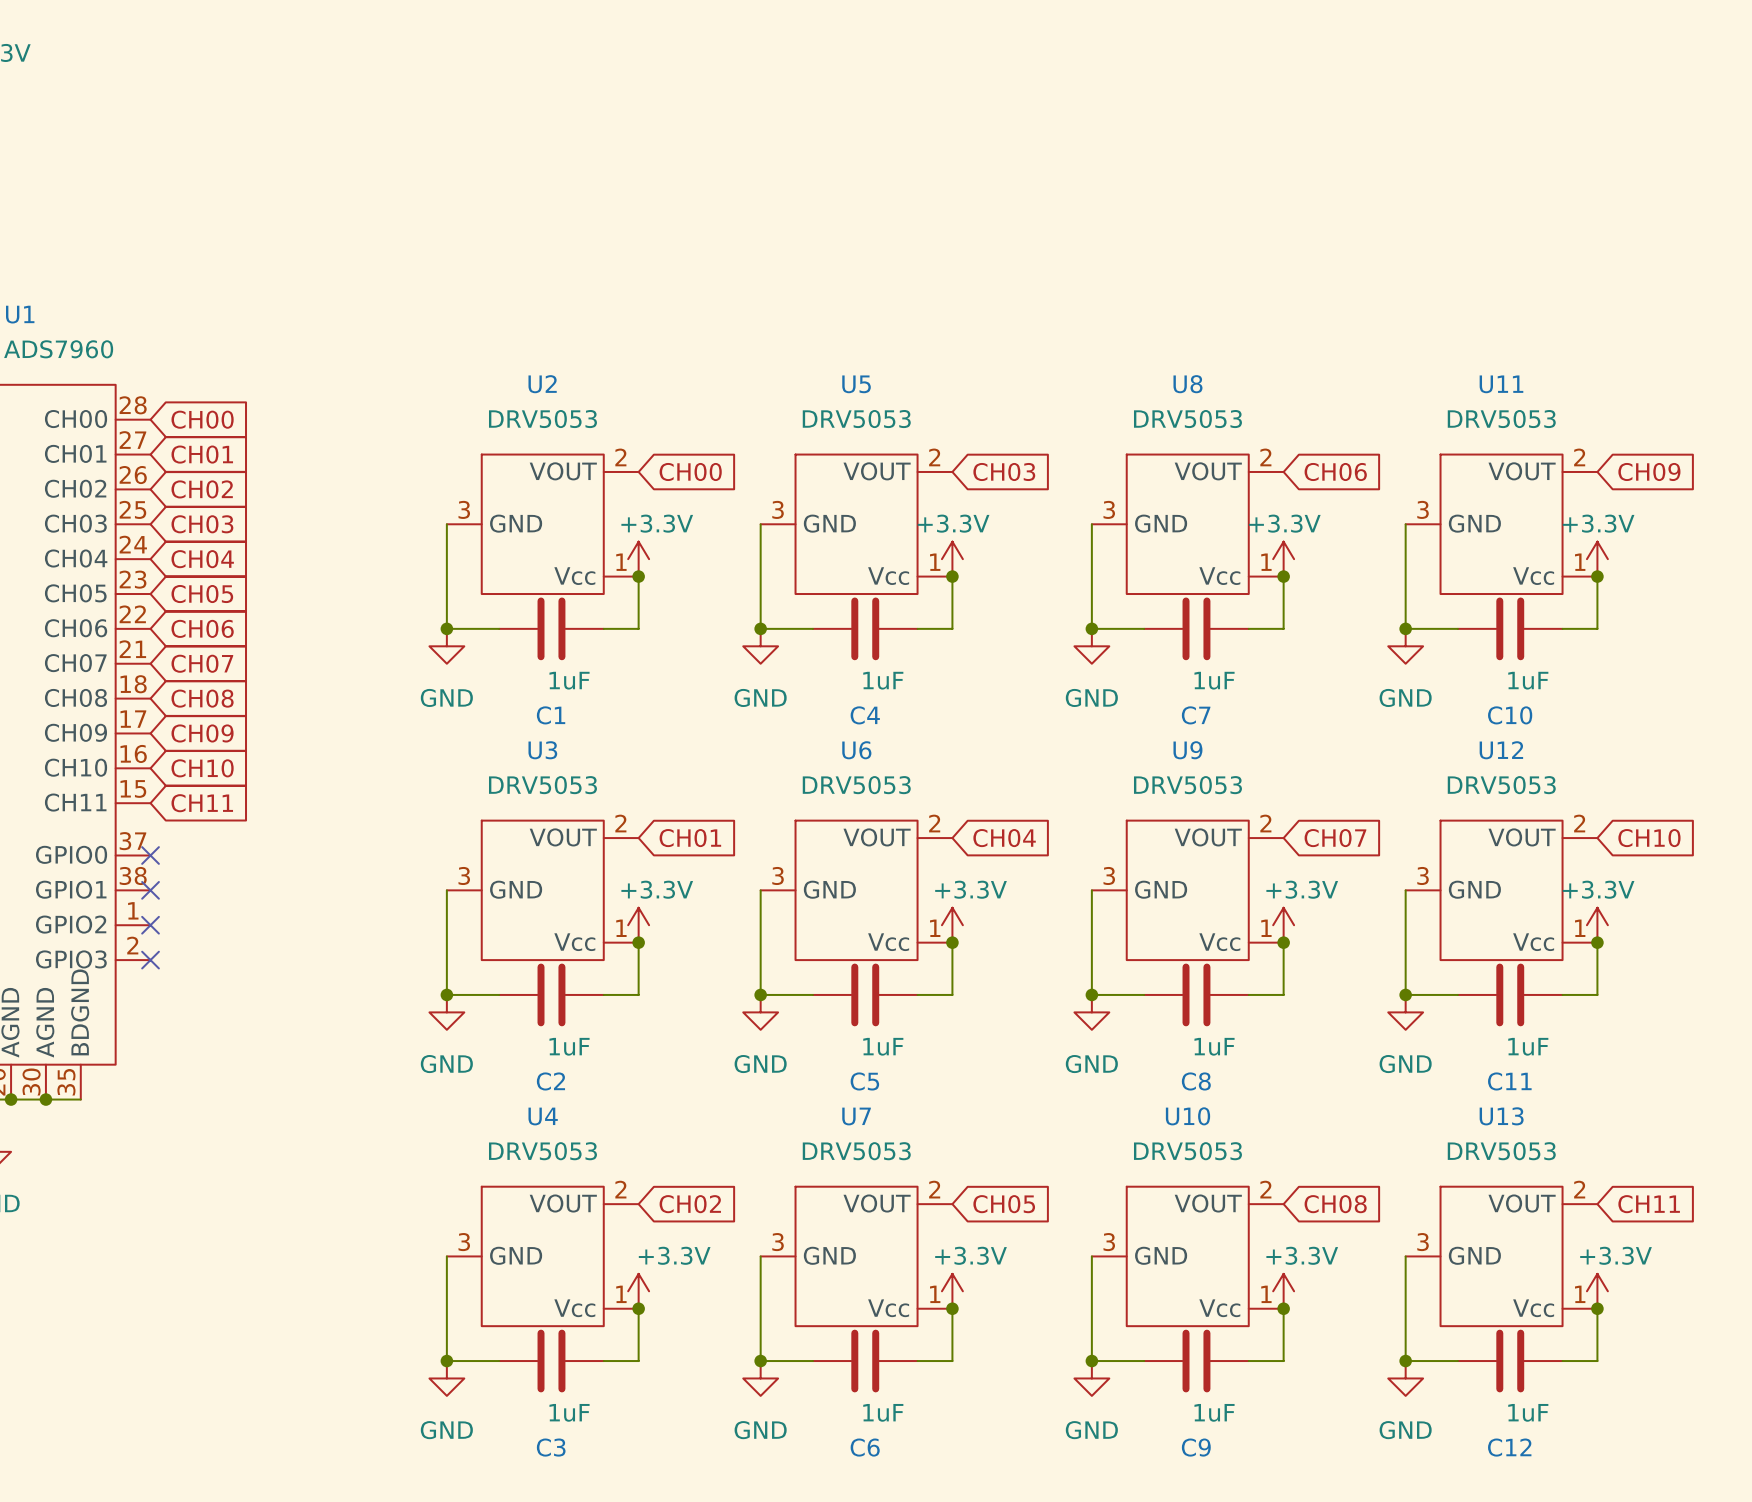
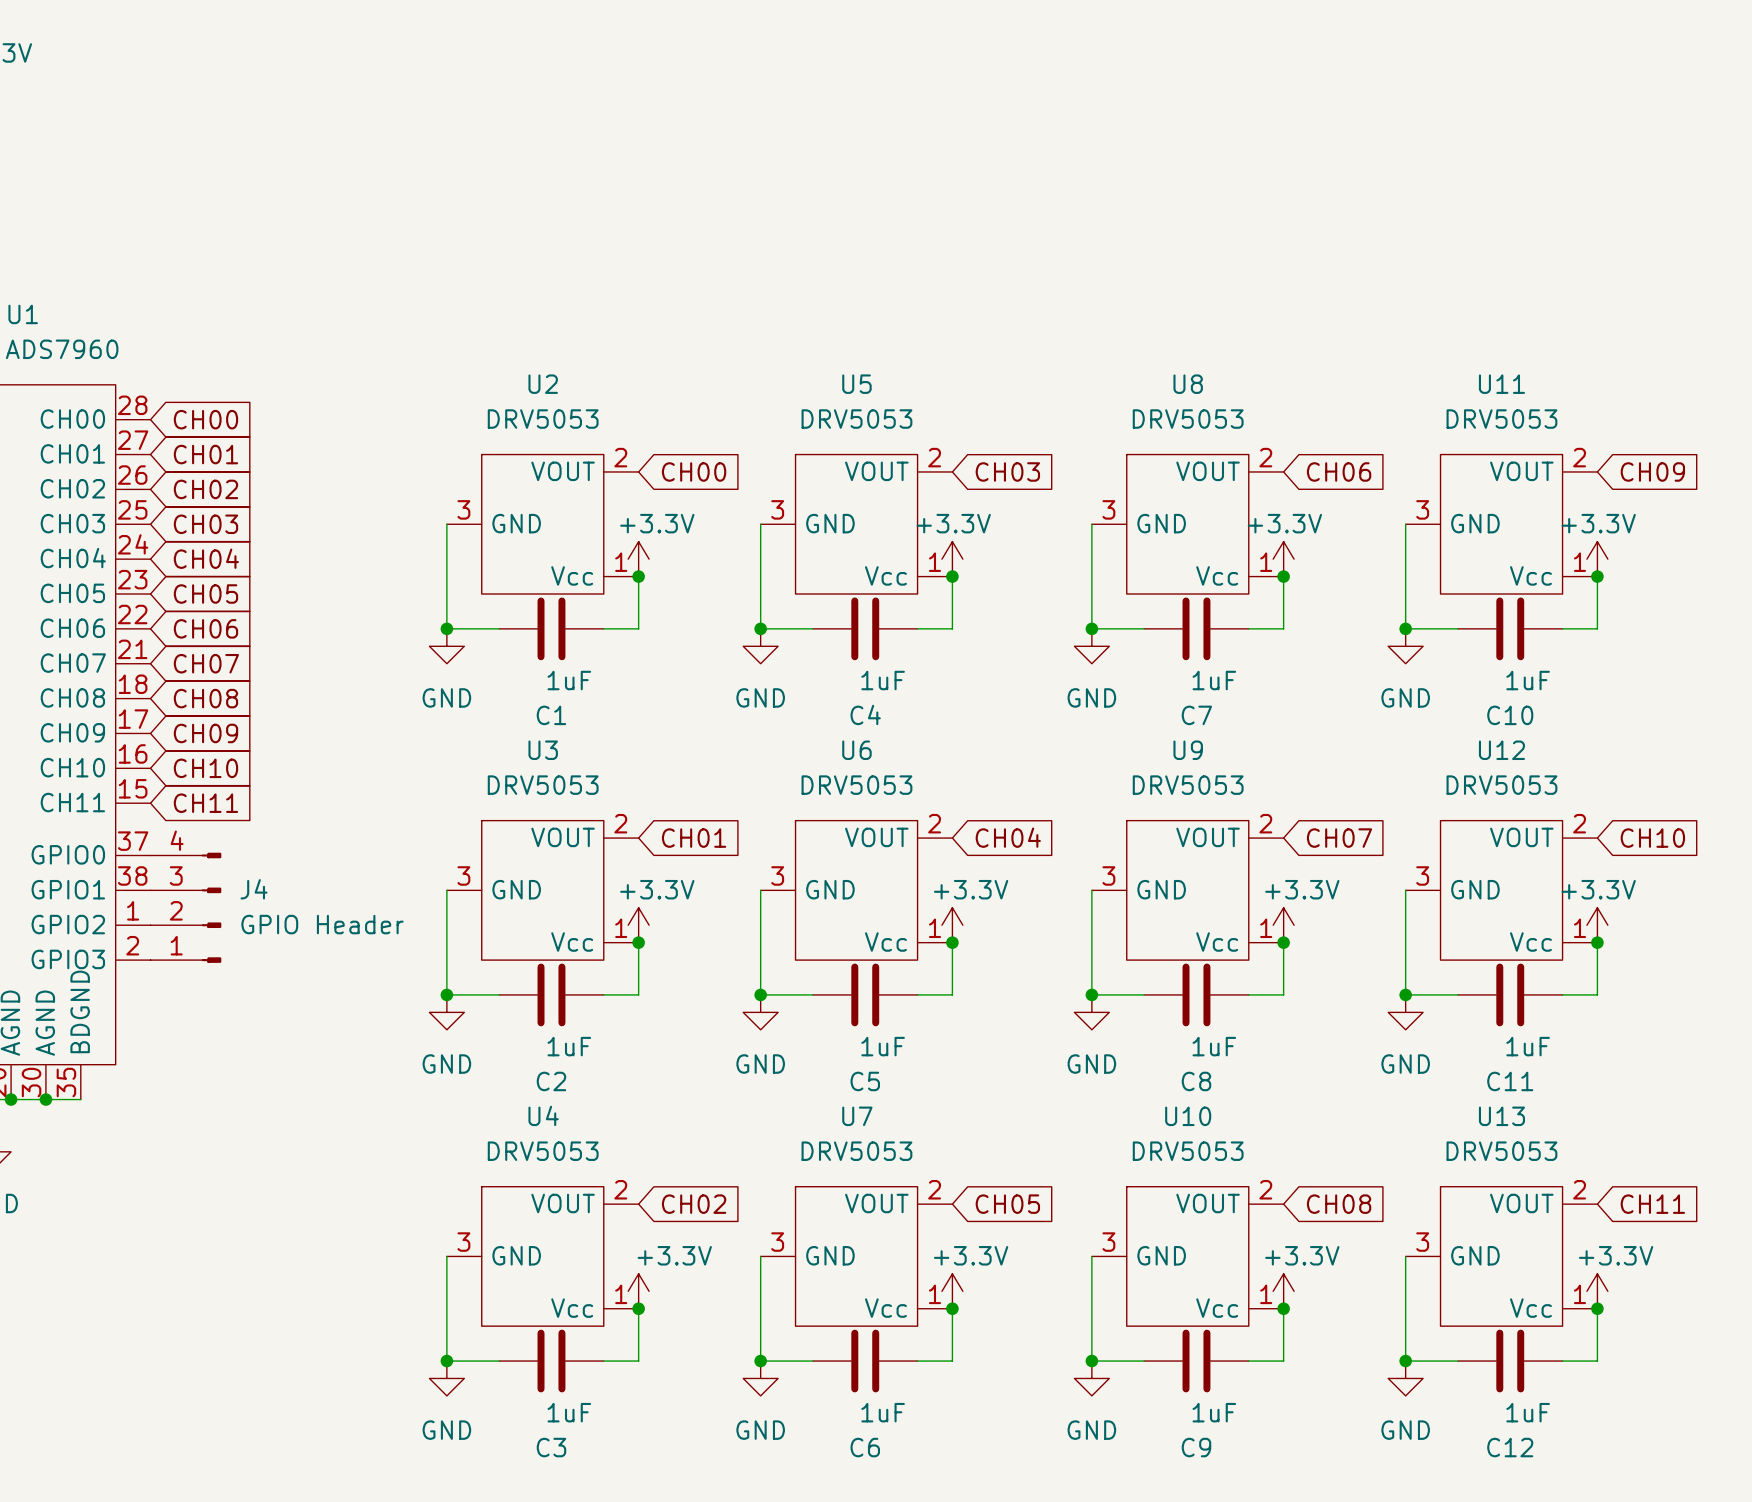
no-connect mark: (150, 855) -> none
no-connect mark: (150, 890) -> none
J4: none -> GPIO Header (185, 907)
no-connect mark: (150, 925) -> none
no-connect mark: (150, 960) -> none

